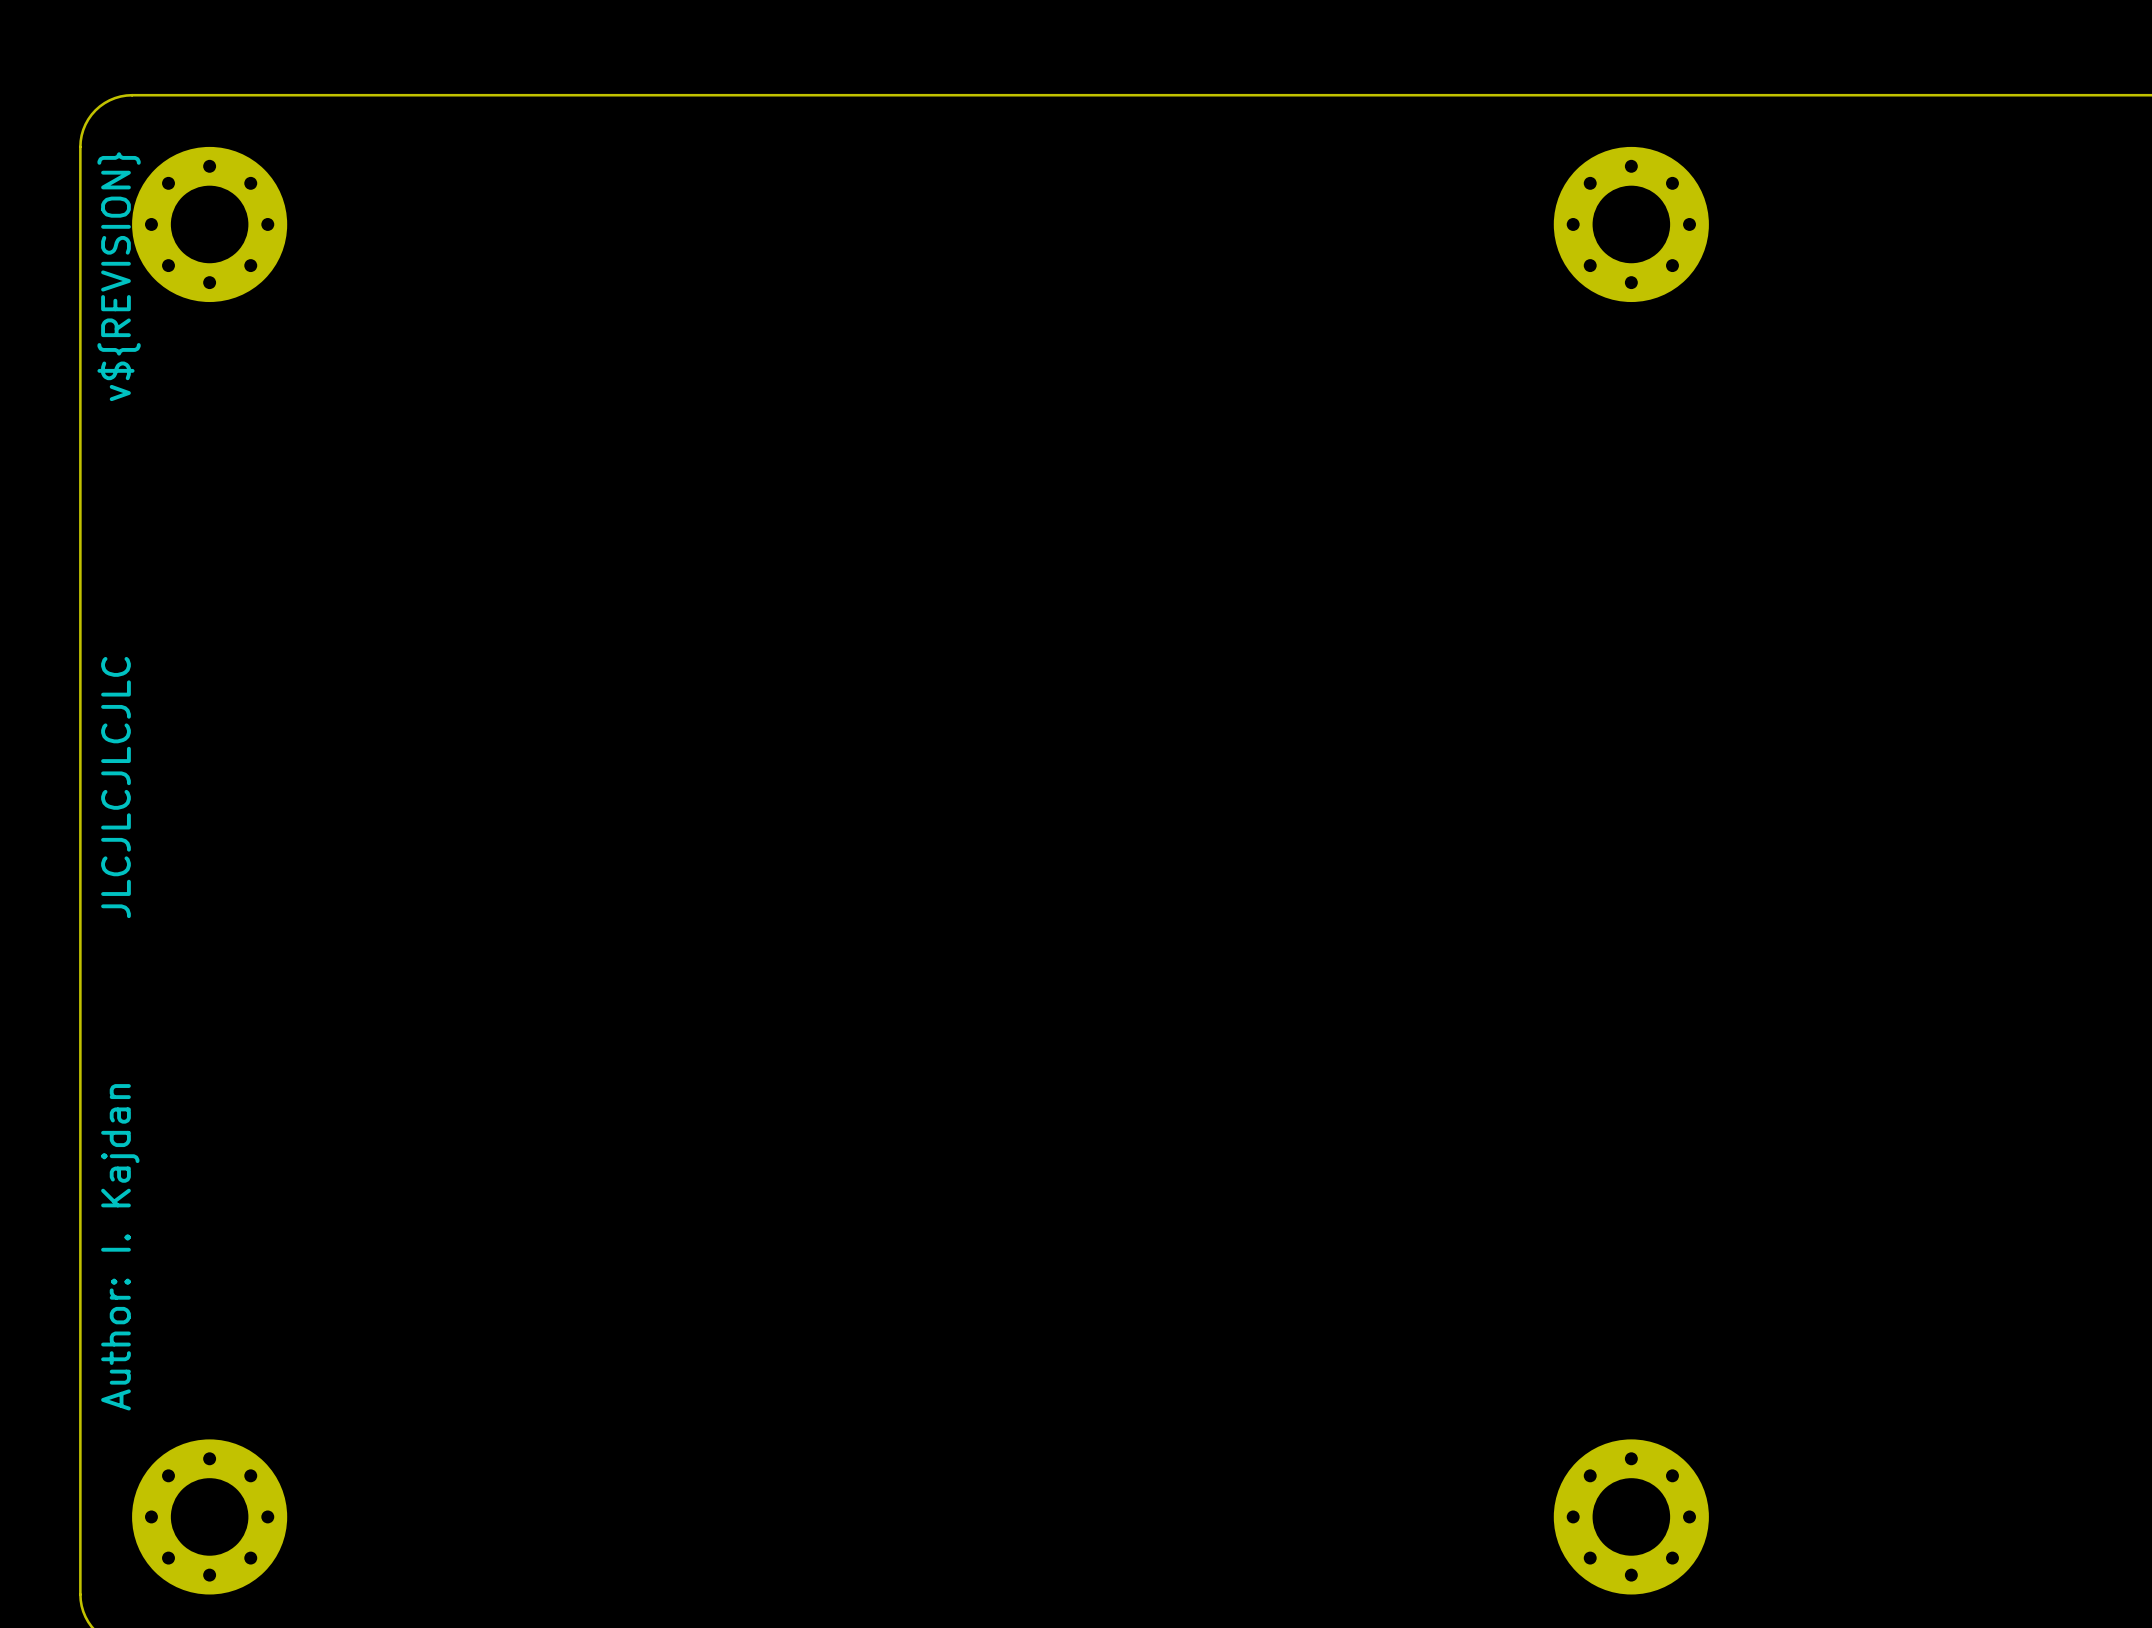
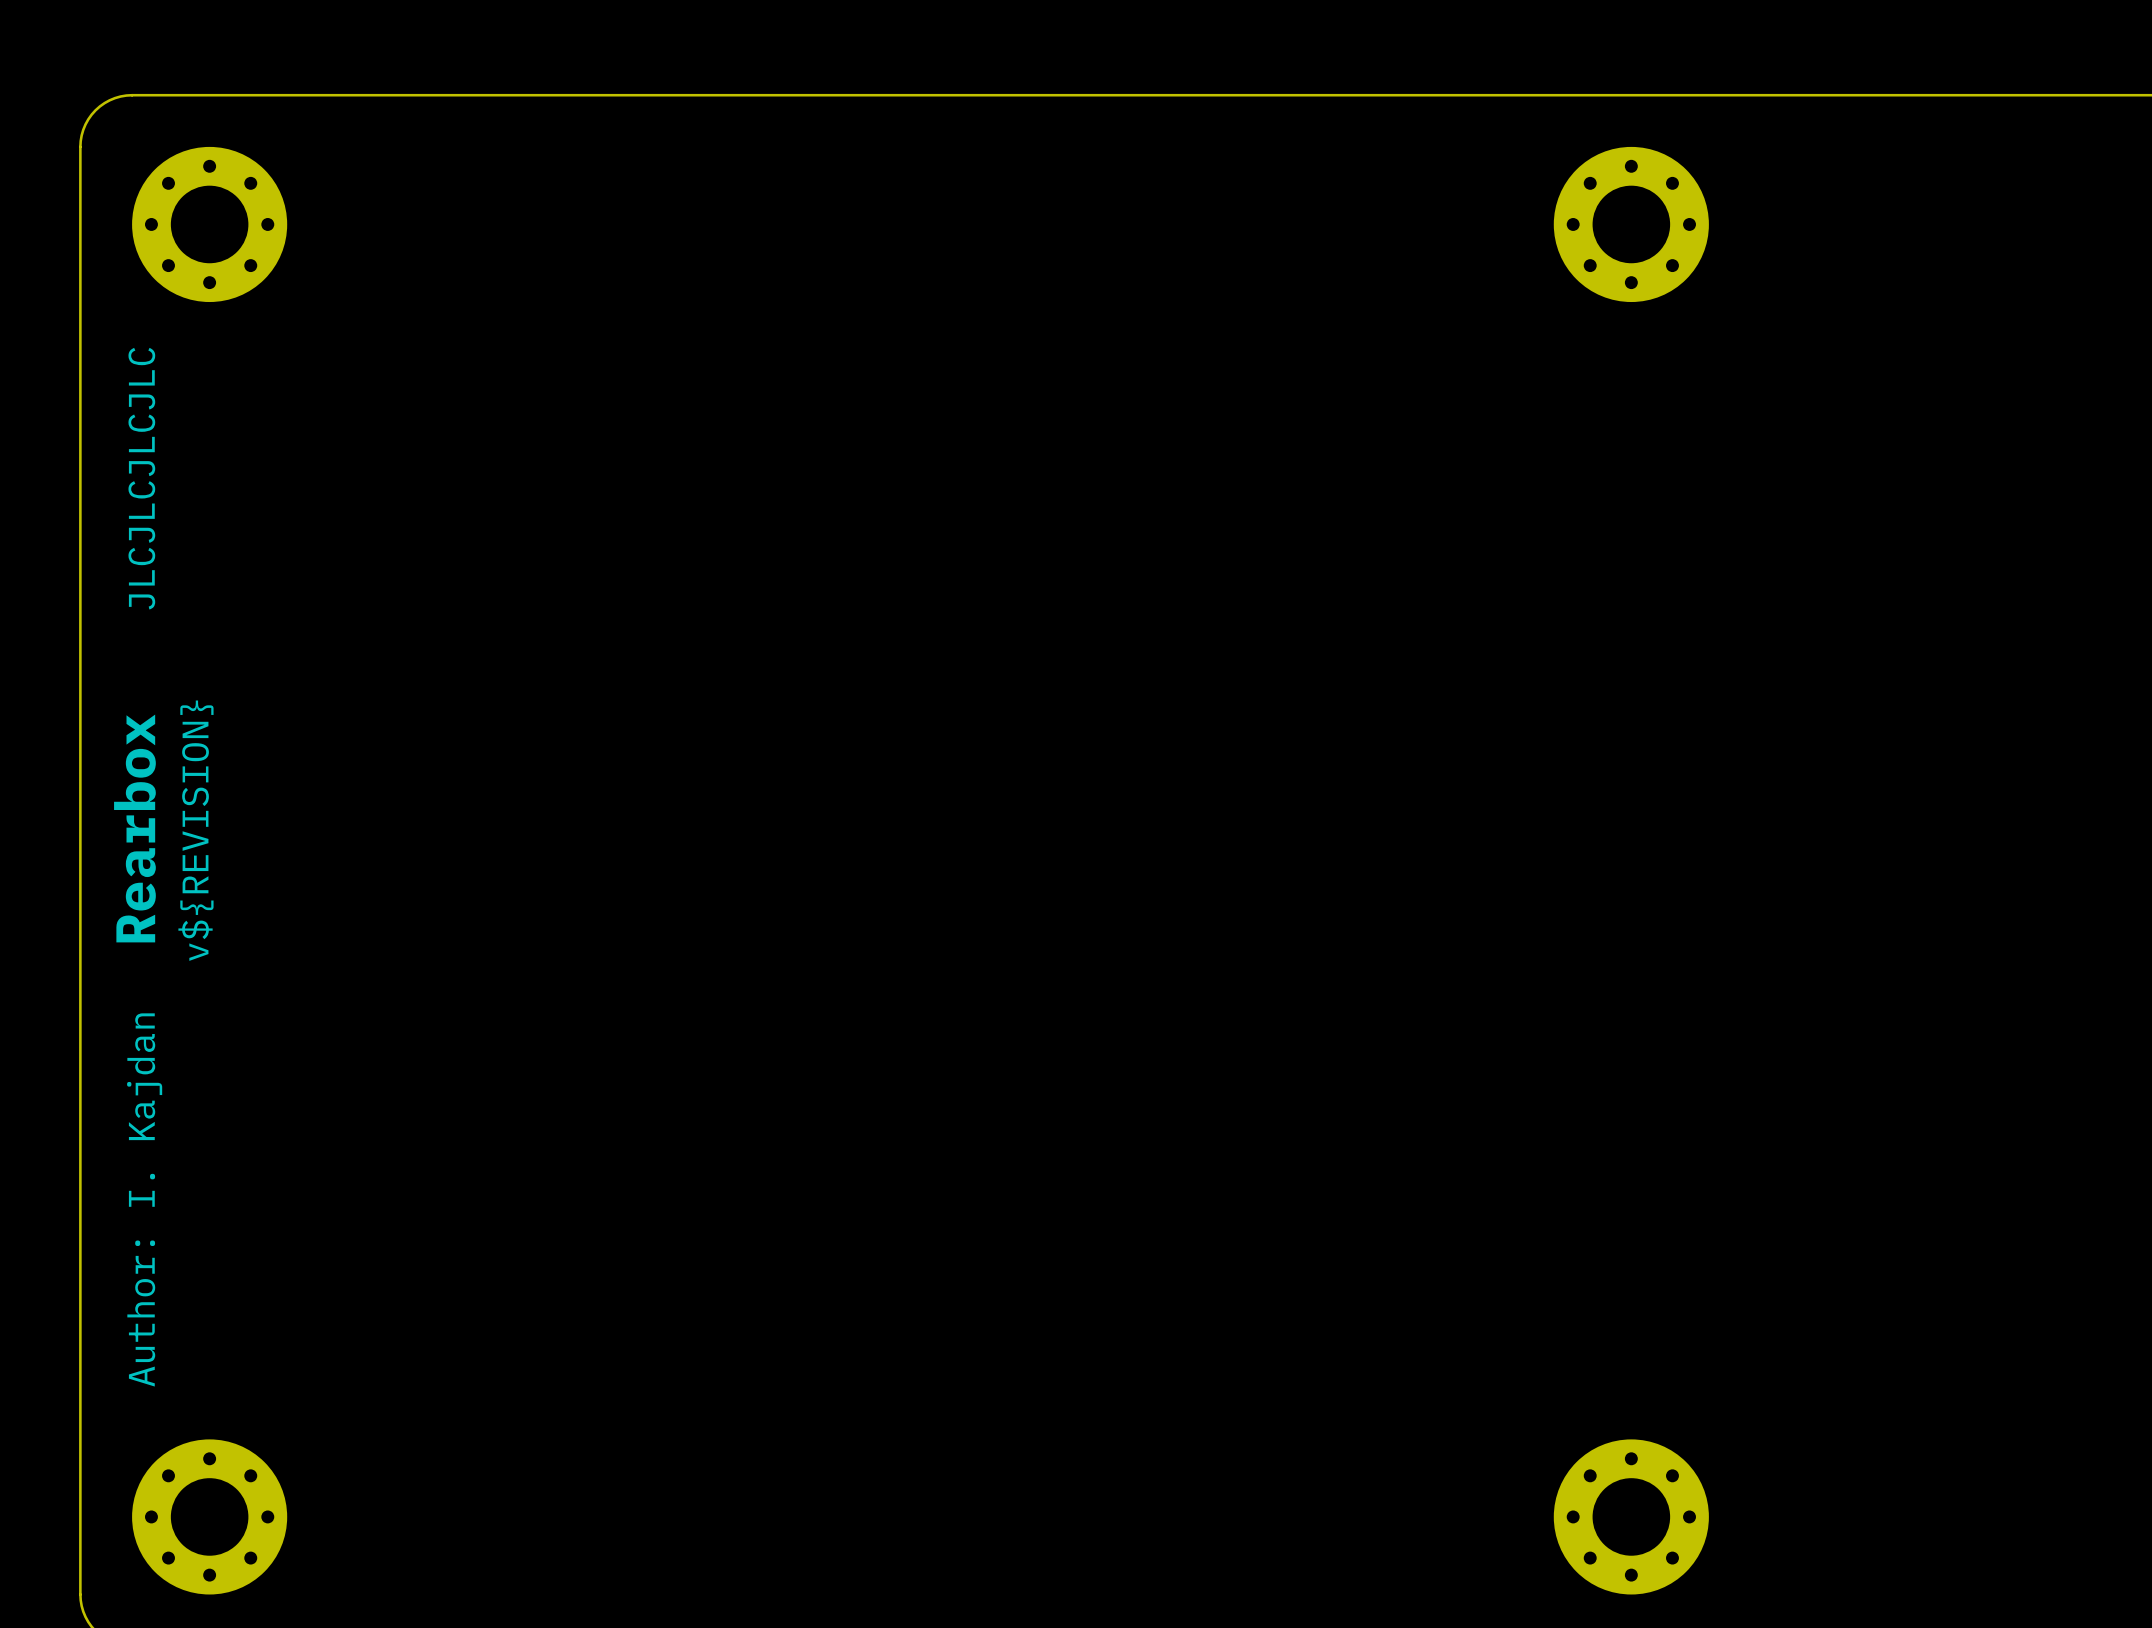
text position: v${REVISION} (119, 276) -> v${REVISION} (195, 830)
text position: JLCJLCJLCJLC (115, 787) -> JLCJLCJLCJLC (141, 478)
text: none -> Rearbox (134, 828)
text position: Author: I. Kajdan (120, 1247) -> Author: I. Kajdan (144, 1199)

